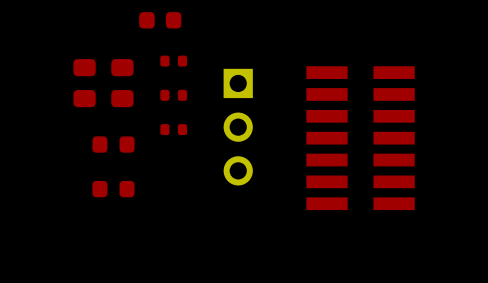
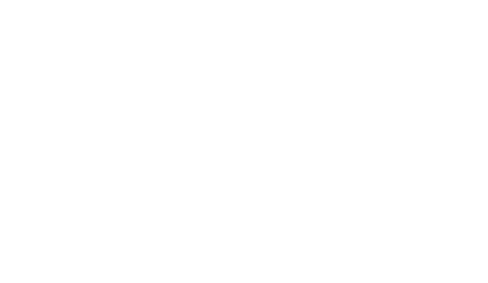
part: (160, 20) -> none
part: (173, 61) -> none
part: (103, 83) -> none
part: (173, 95) -> none
part: (238, 127) -> none
part: (173, 129) -> none
part: (360, 138) -> none
part: (113, 144) -> none
part: (113, 189) -> none

